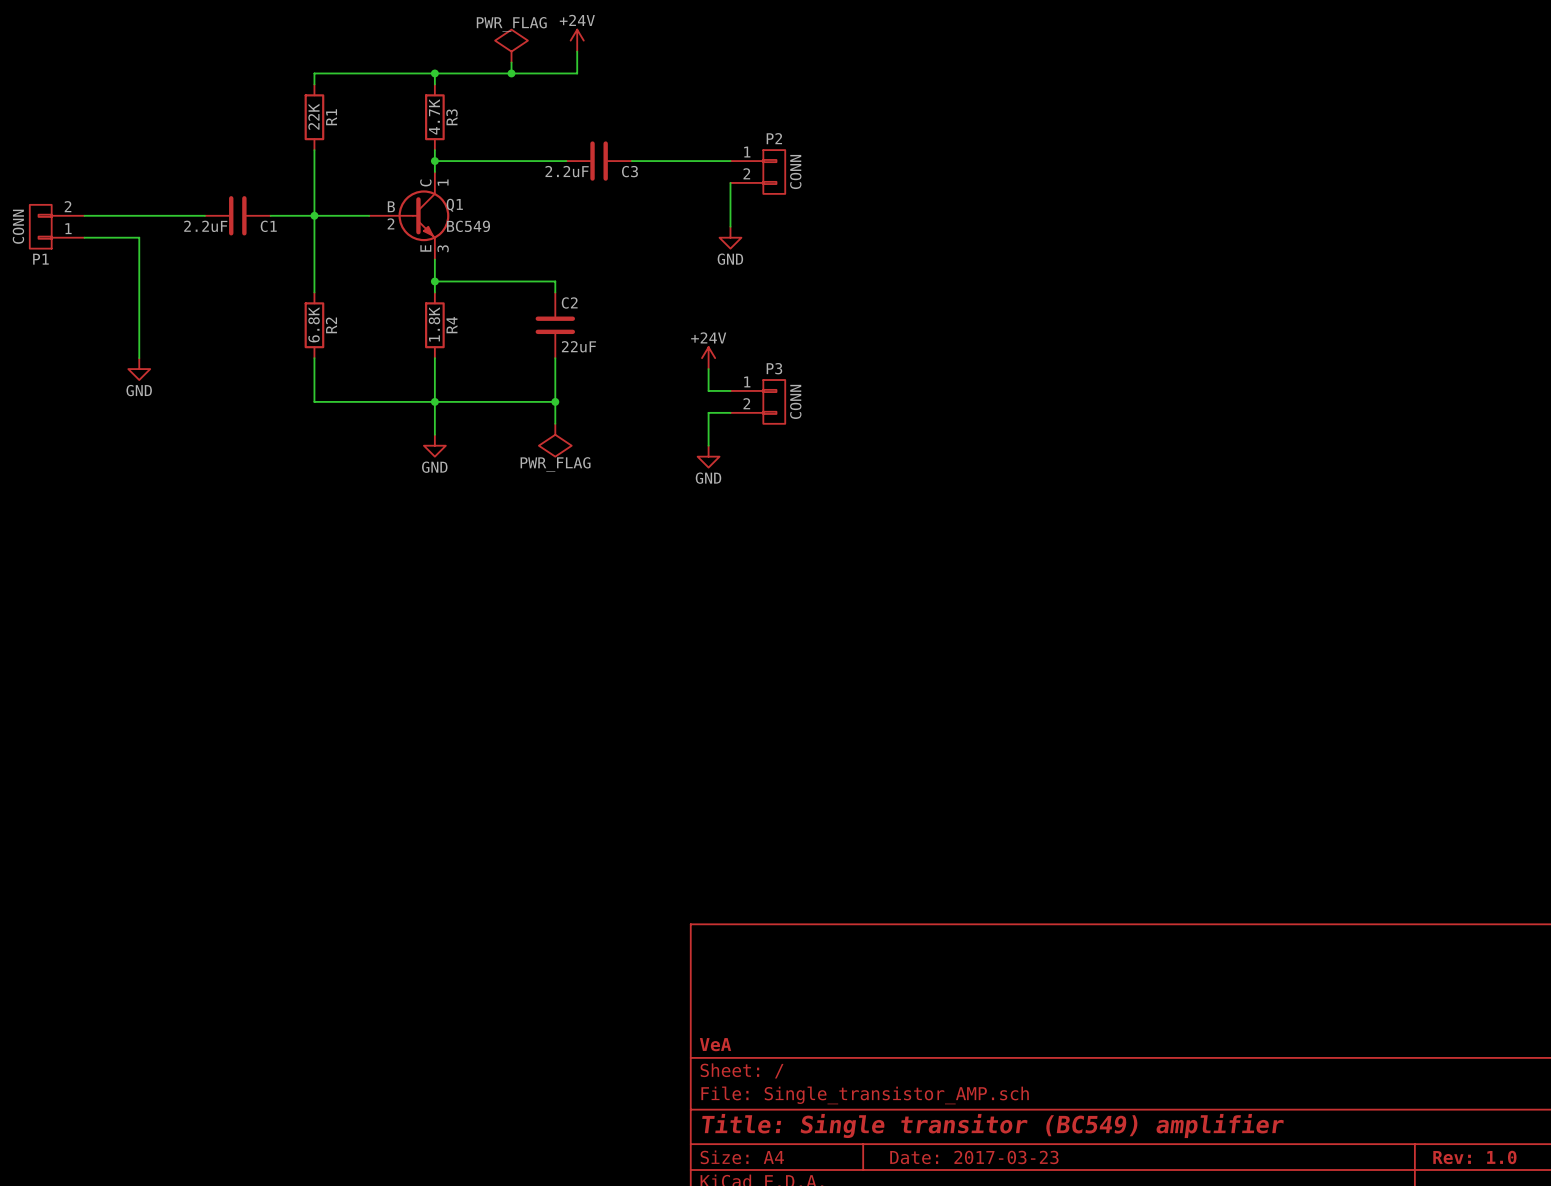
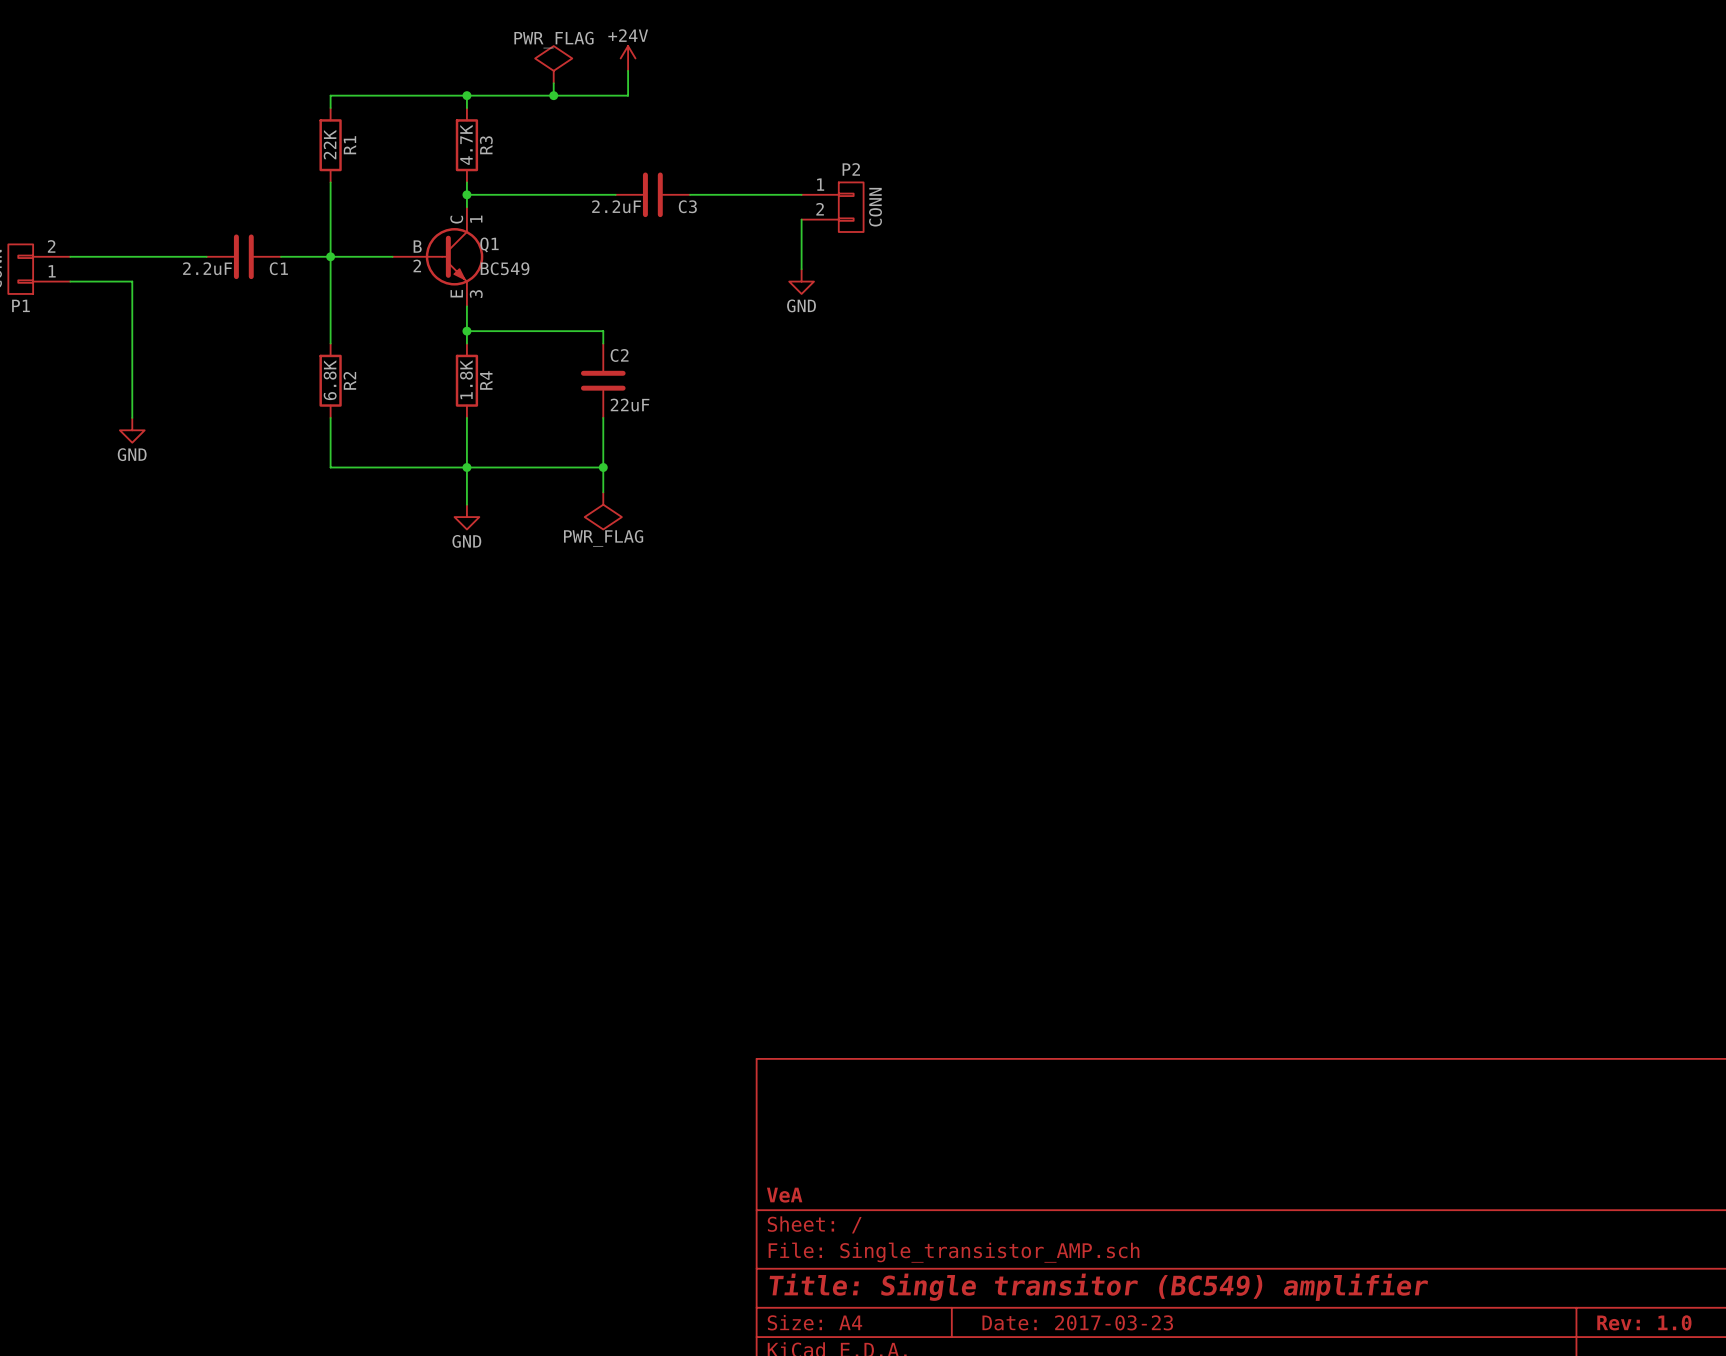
power symbol: +24V (708, 358) -> none
wire: (708, 369) (708, 390) (730, 390) -> none
P3: CONN (757, 401) -> none
wire: (730, 412) (708, 412) (708, 445) -> none
power symbol: GND (708, 456) -> none

